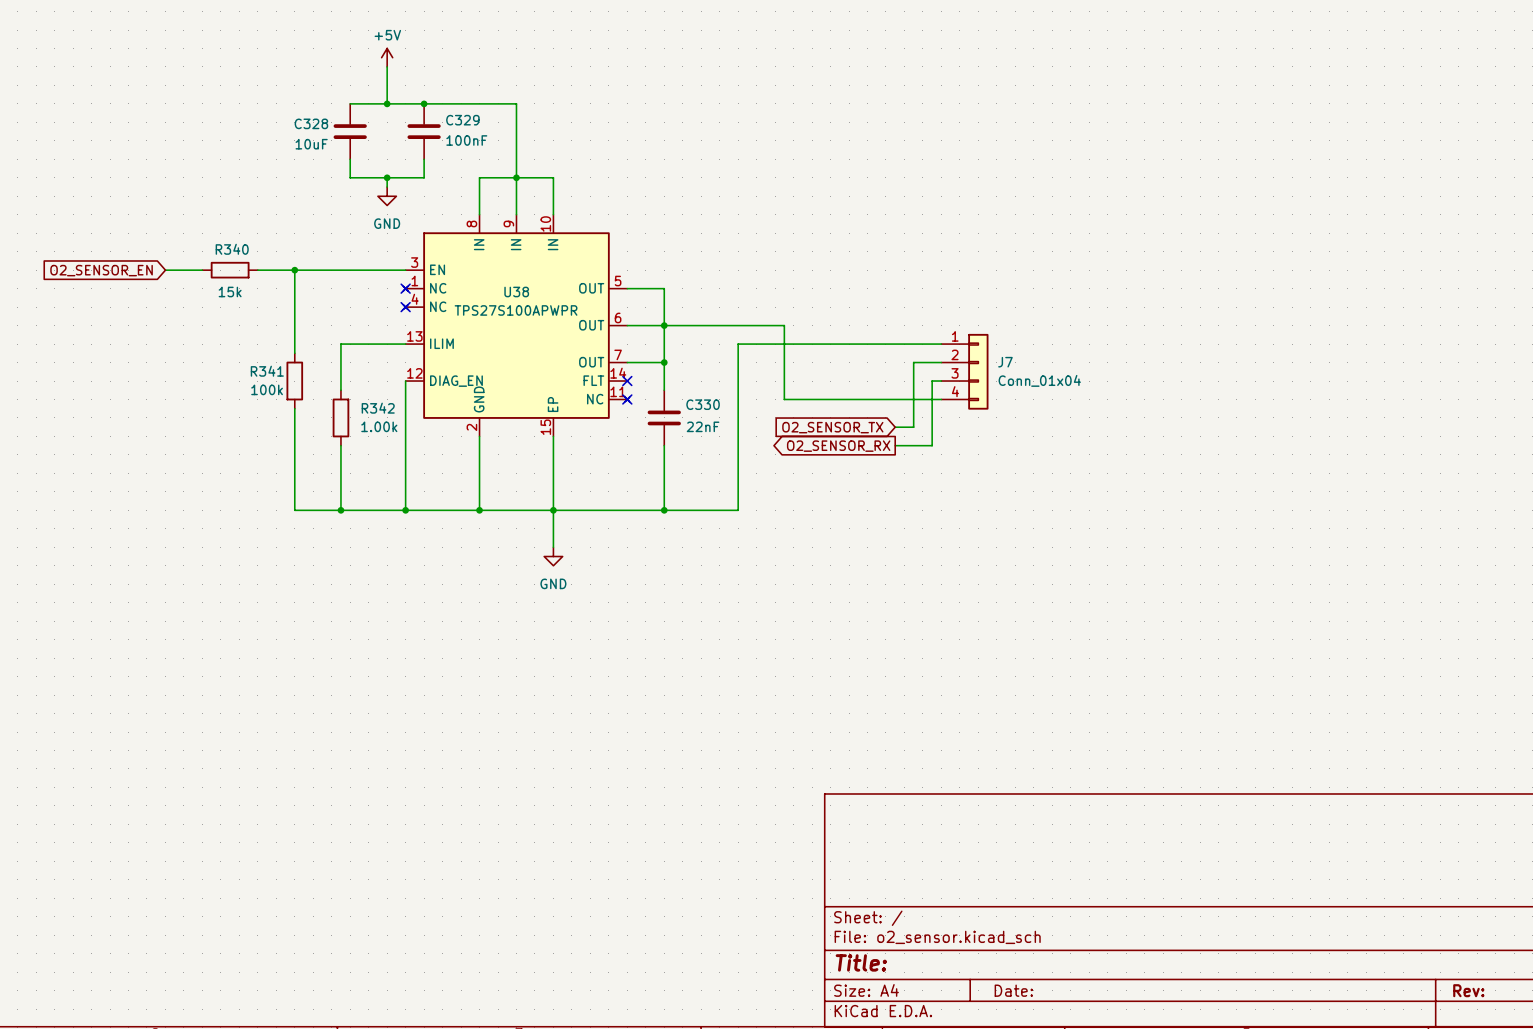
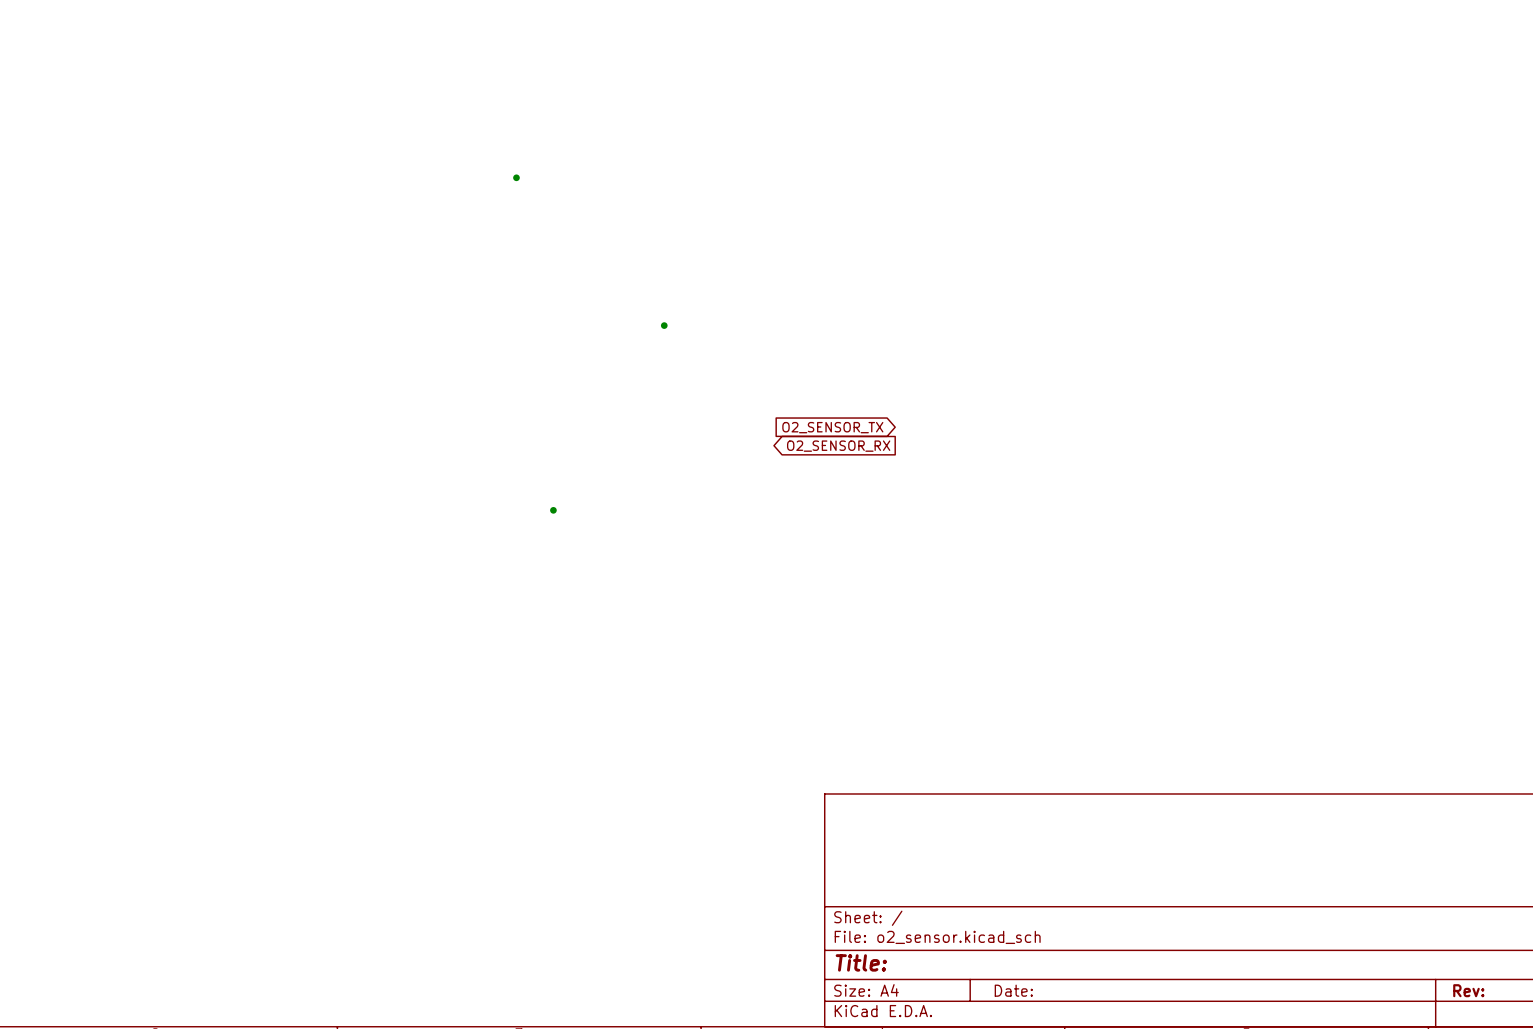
power symbol: +5V (387, 57) -> none
wire: (387, 66) (387, 103) -> none
wire: (350, 103) (516, 103) (516, 214) -> none
junction: (387, 103) -> none
junction: (424, 103) -> none
C328: 10uF (350, 131) -> none
C329: 100nF (424, 131) -> none
wire: (350, 159) (350, 177) (424, 177) (424, 159) -> none
wire: (387, 177) (387, 187) -> none
junction: (387, 177) -> none
power symbol: GND (387, 196) -> none
wire: (479, 214) (479, 177) (553, 177) (553, 214) -> none
global label: O2_SENSOR_EN (101, 270) -> none
wire: (165, 270) (202, 270) -> none
R340: 15k (230, 270) -> none
wire: (257, 270) (405, 270) -> none
wire: (294, 270) (294, 353) -> none
junction: (294, 270) -> none
no-connect mark: (405, 288) -> none
wire: (627, 288) (664, 288) (664, 390) -> none
no-connect mark: (405, 307) -> none
U38: TPS27S100APWPR (516, 325) -> none
wire: (627, 325) (784, 325) (784, 399) (941, 399) -> none
wire: (405, 344) (340, 344) (340, 390) -> none
wire: (941, 344) (738, 344) (738, 510) (294, 510) (294, 408) -> none
wire: (627, 362) (664, 362) -> none
junction: (664, 362) -> none
wire: (941, 362) (913, 362) (913, 427) (895, 427) -> none
J7: Conn_01x04 (964, 371) -> none
R341: 100k (294, 381) -> none
wire: (405, 381) (405, 510) -> none
no-connect mark: (627, 381) -> none
wire: (941, 381) (932, 381) (932, 445) (895, 445) -> none
no-connect mark: (627, 399) -> none
R342: 1.00k (340, 417) -> none
C330: 22nF (664, 417) -> none
wire: (479, 436) (479, 510) -> none
wire: (553, 436) (553, 547) -> none
wire: (340, 445) (340, 510) -> none
wire: (664, 445) (664, 510) -> none
junction: (340, 510) -> none
junction: (405, 510) -> none
junction: (479, 510) -> none
junction: (664, 510) -> none
power symbol: GND (553, 556) -> none

